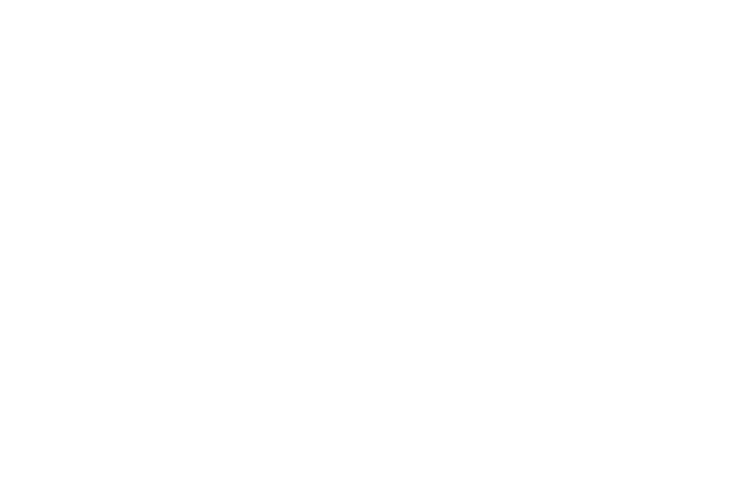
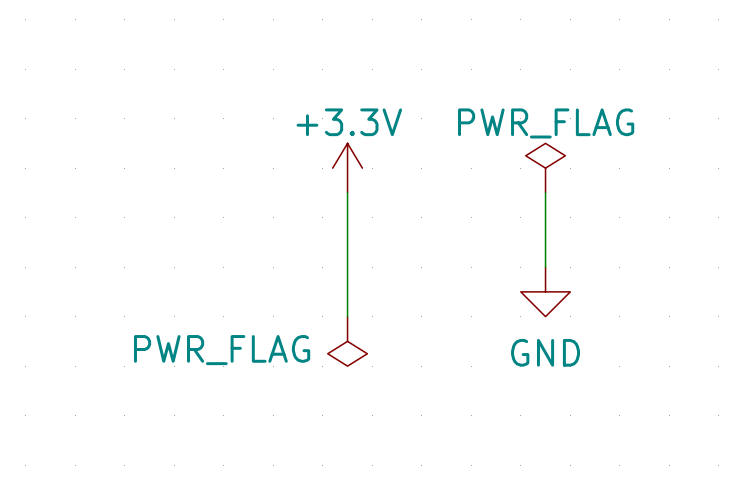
power symbol: none -> +3.3V (347, 168)
power symbol: none -> PWR_FLAG (545, 168)
wire: none -> (347, 192) (347, 316)
wire: none -> (545, 192) (545, 267)
power symbol: none -> GND (545, 291)
power symbol: none -> PWR_FLAG (347, 341)

